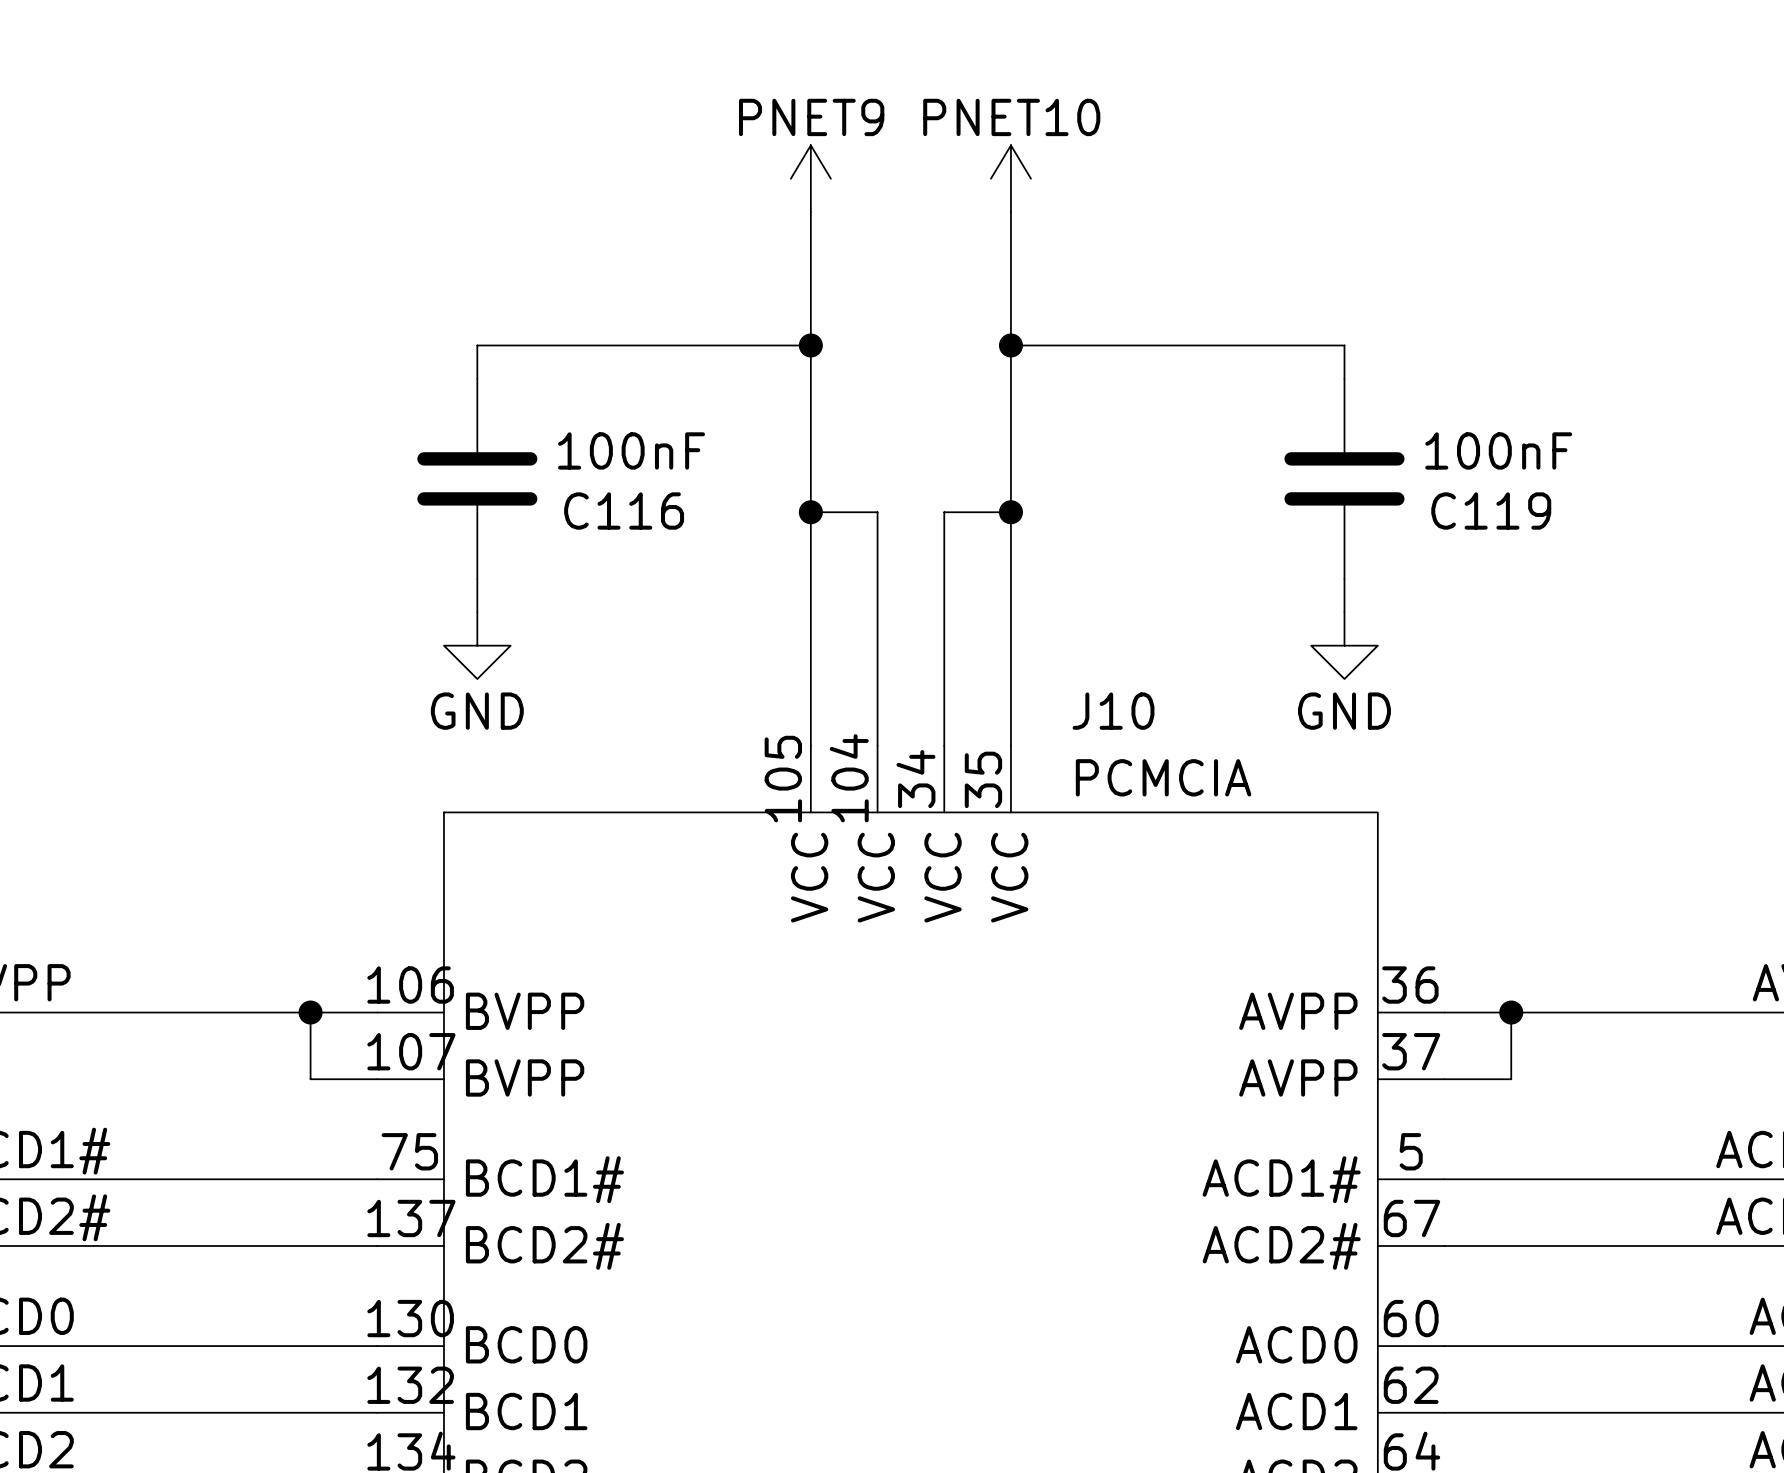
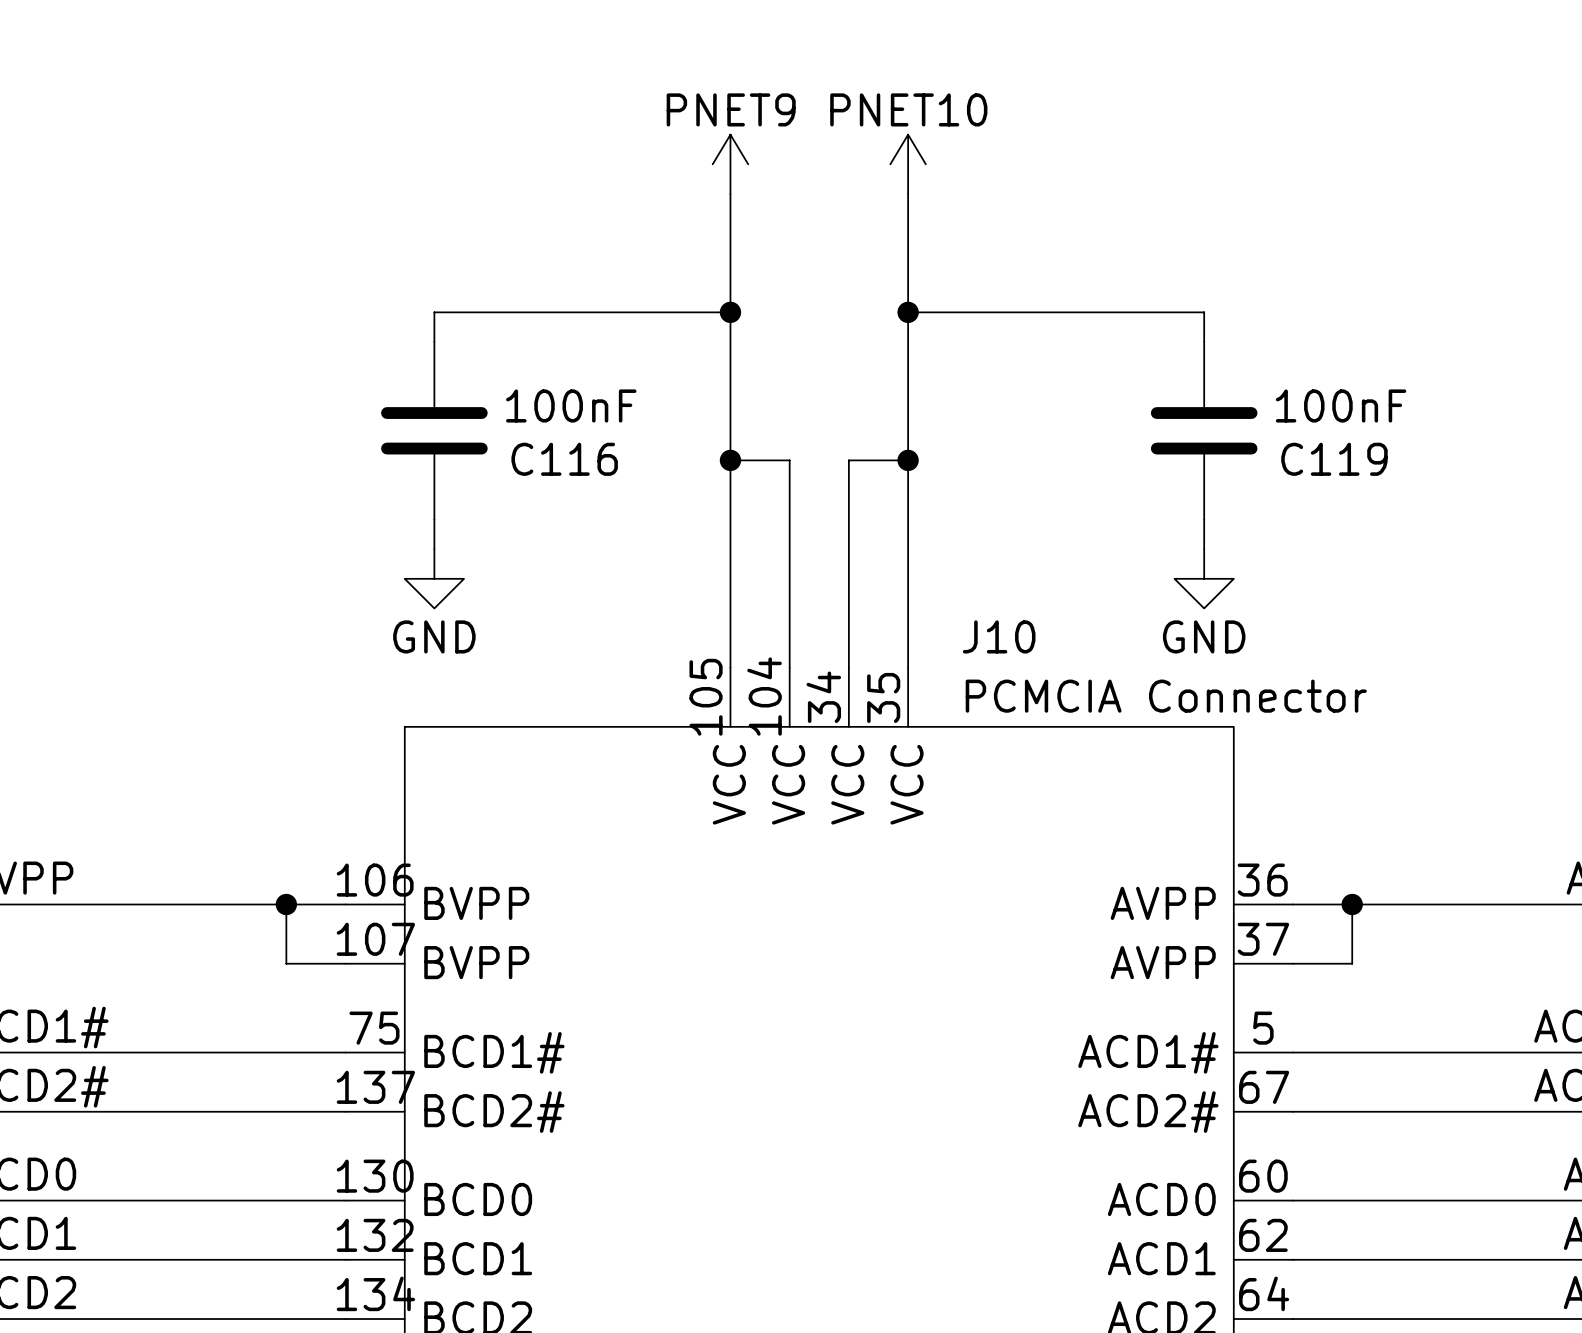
J10 value: PCMCIA (1163, 777) -> PCMCIA Connector (1166, 696)

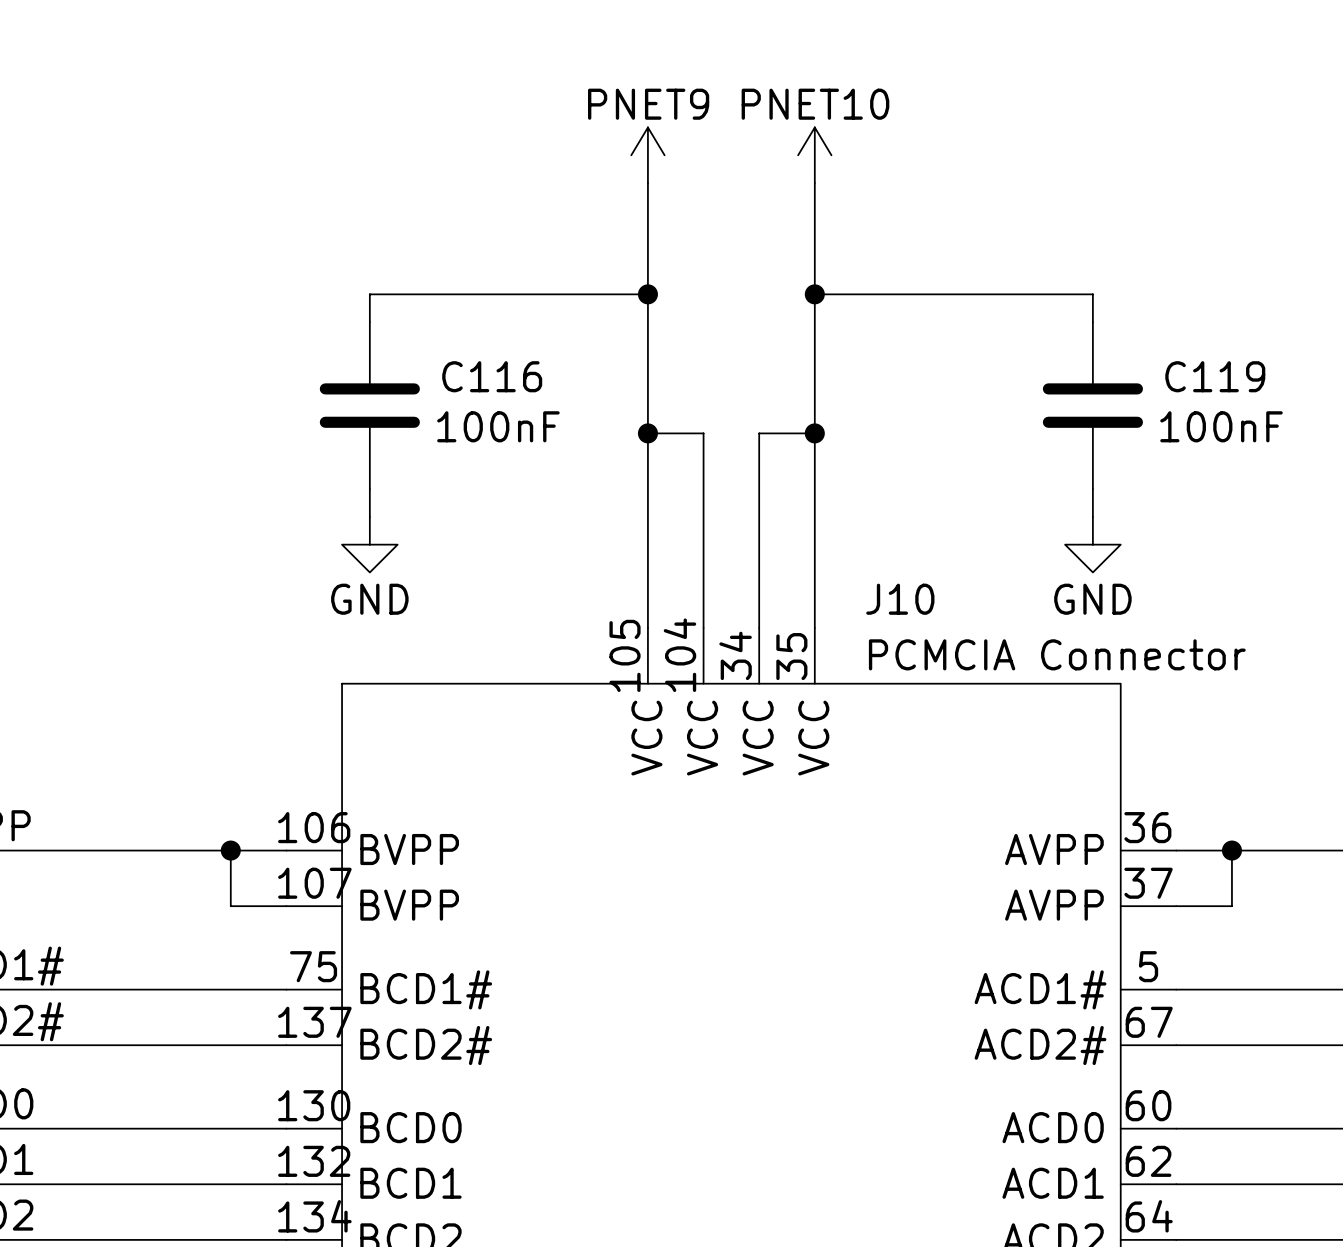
C116 value position: 100nF (571, 405) -> 100nF (498, 426)
C119 value position: 100nF (1341, 405) -> 100nF (1221, 426)
C116 name position: C116 (564, 459) -> C116 (492, 376)
C119 name position: C119 (1334, 459) -> C119 (1215, 376)

